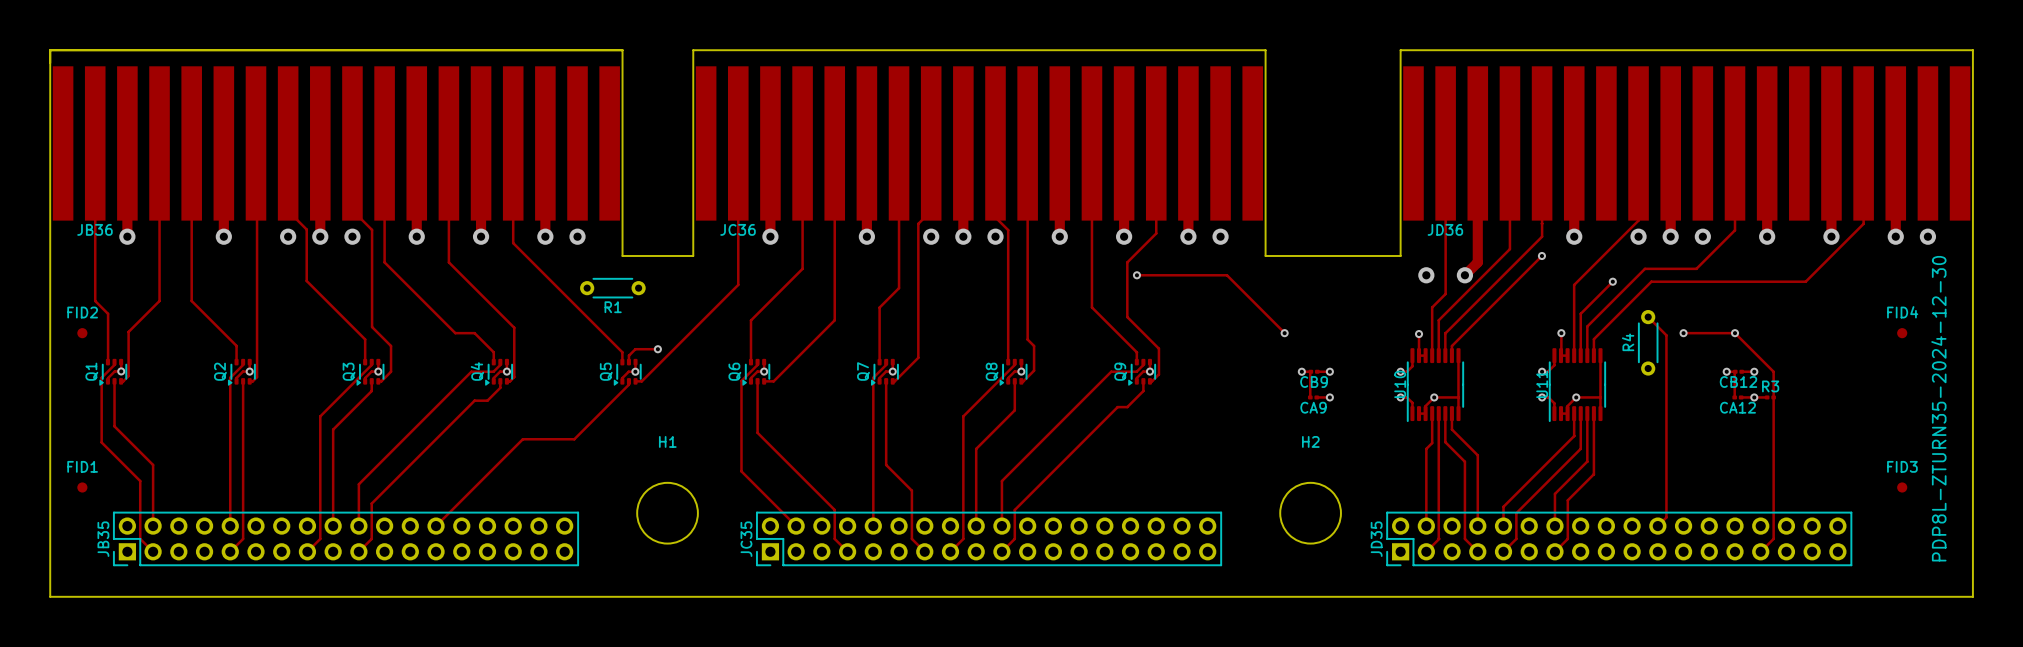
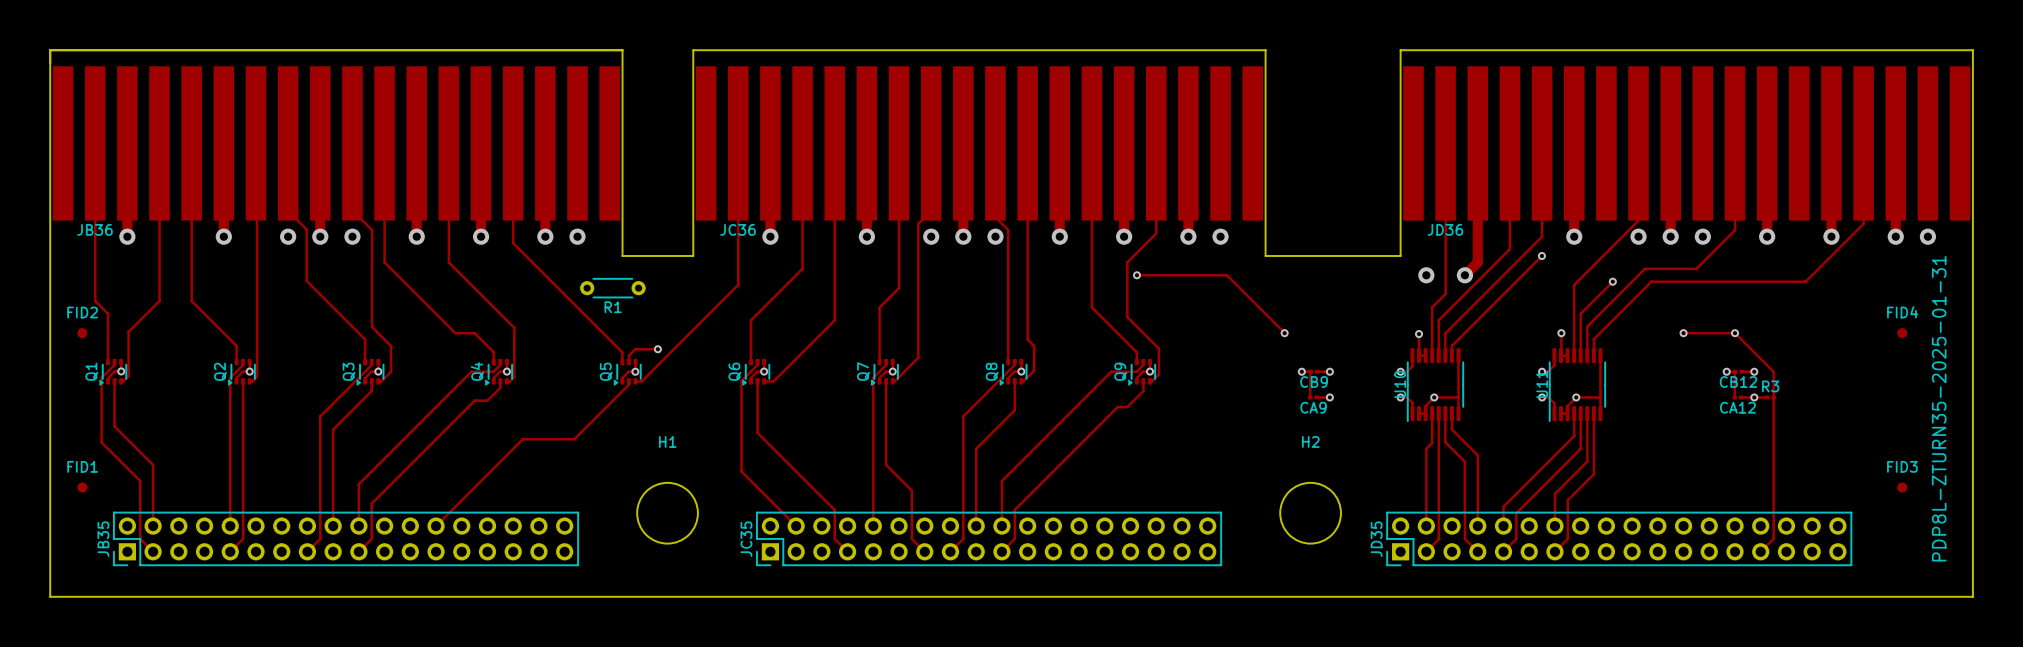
track: (1648, 317) (1666, 335) (1666, 517) (1657, 526) -> none
R4: (1648, 342) -> none
text: PDP8L-ZTURN35-2024-12-30 (1938, 408) -> PDP8L-ZTURN35-2025-01-31 (1939, 408)

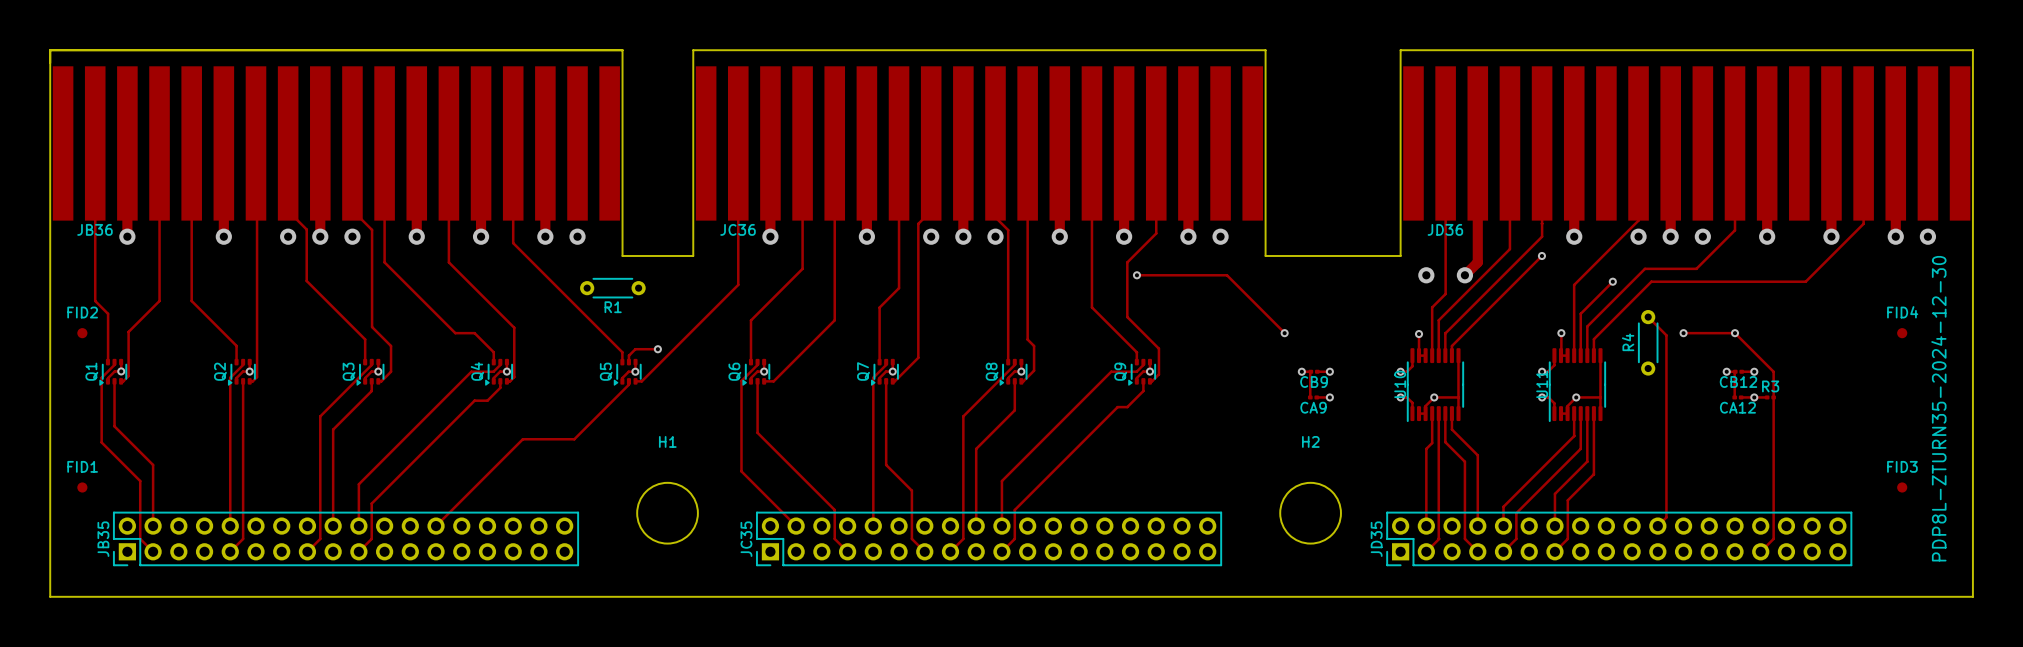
track: none -> (1648, 317) (1666, 335) (1666, 517) (1657, 526)
R4: none -> (1648, 342)
text: PDP8L-ZTURN35-2025-01-31 (1939, 408) -> PDP8L-ZTURN35-2024-12-30 (1938, 408)

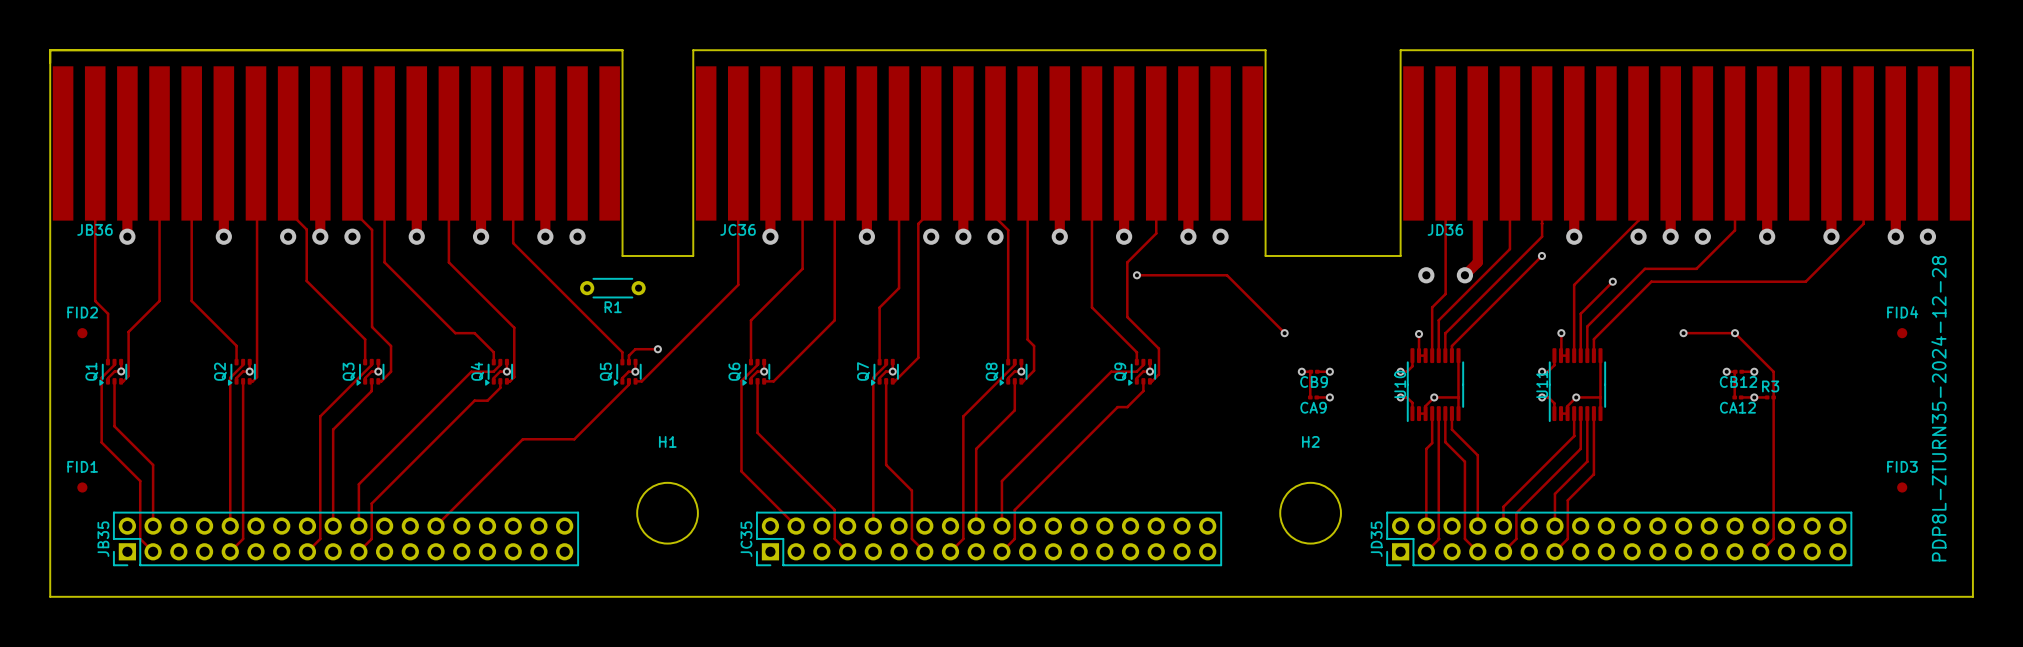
track: (1648, 317) (1666, 335) (1666, 517) (1657, 526) -> none
R4: (1648, 342) -> none
text: PDP8L-ZTURN35-2024-12-30 (1938, 408) -> PDP8L-ZTURN35-2024-12-28 (1938, 408)

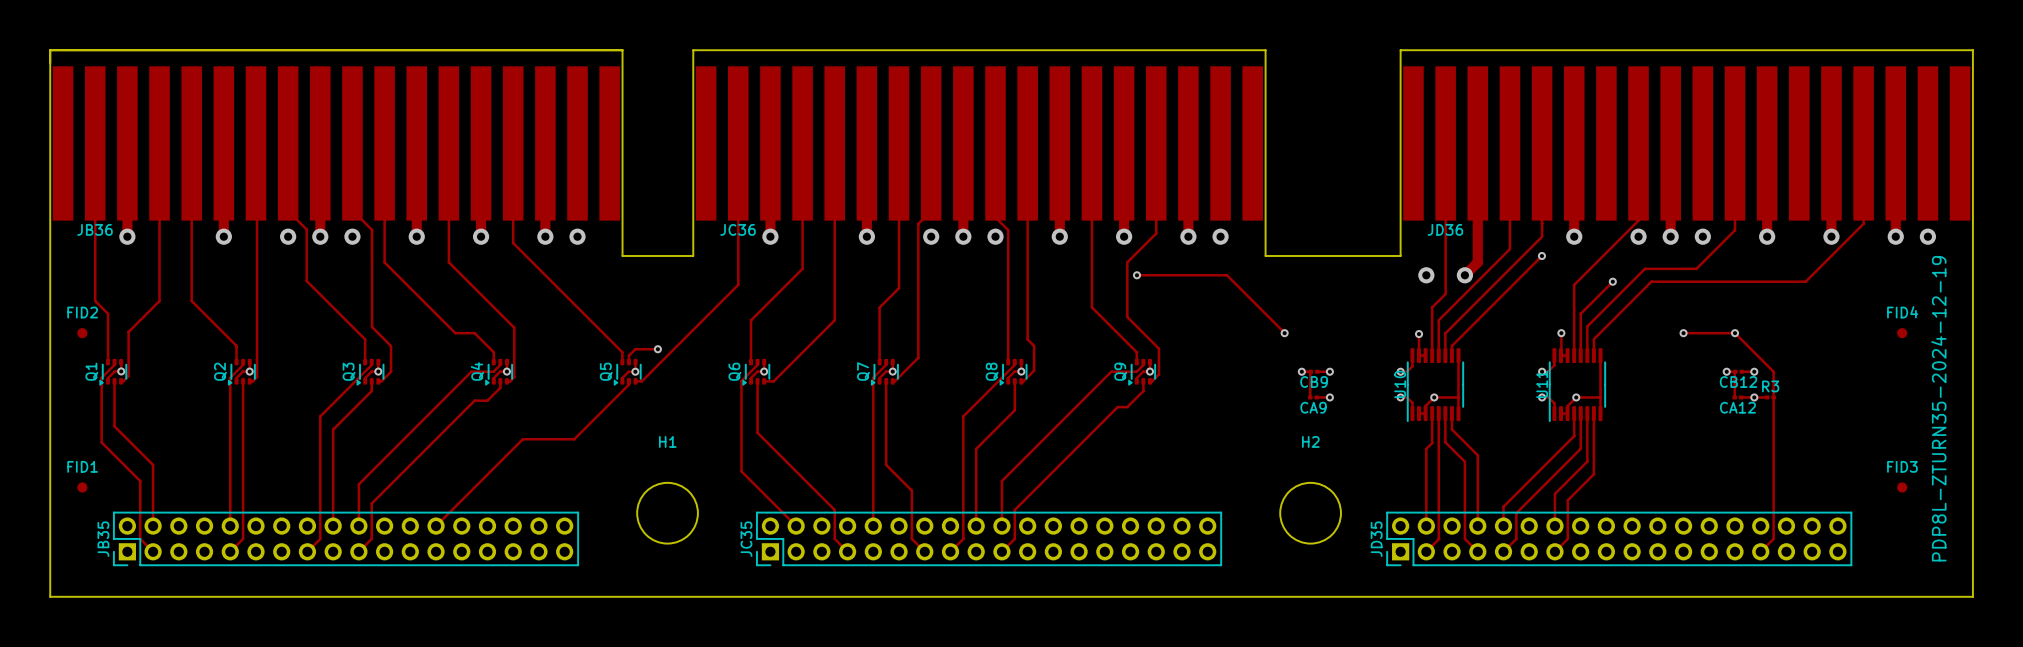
R1: (612, 288) -> none
text: PDP8L-ZTURN35-2024-12-28 (1938, 408) -> PDP8L-ZTURN35-2024-12-19 (1938, 408)

